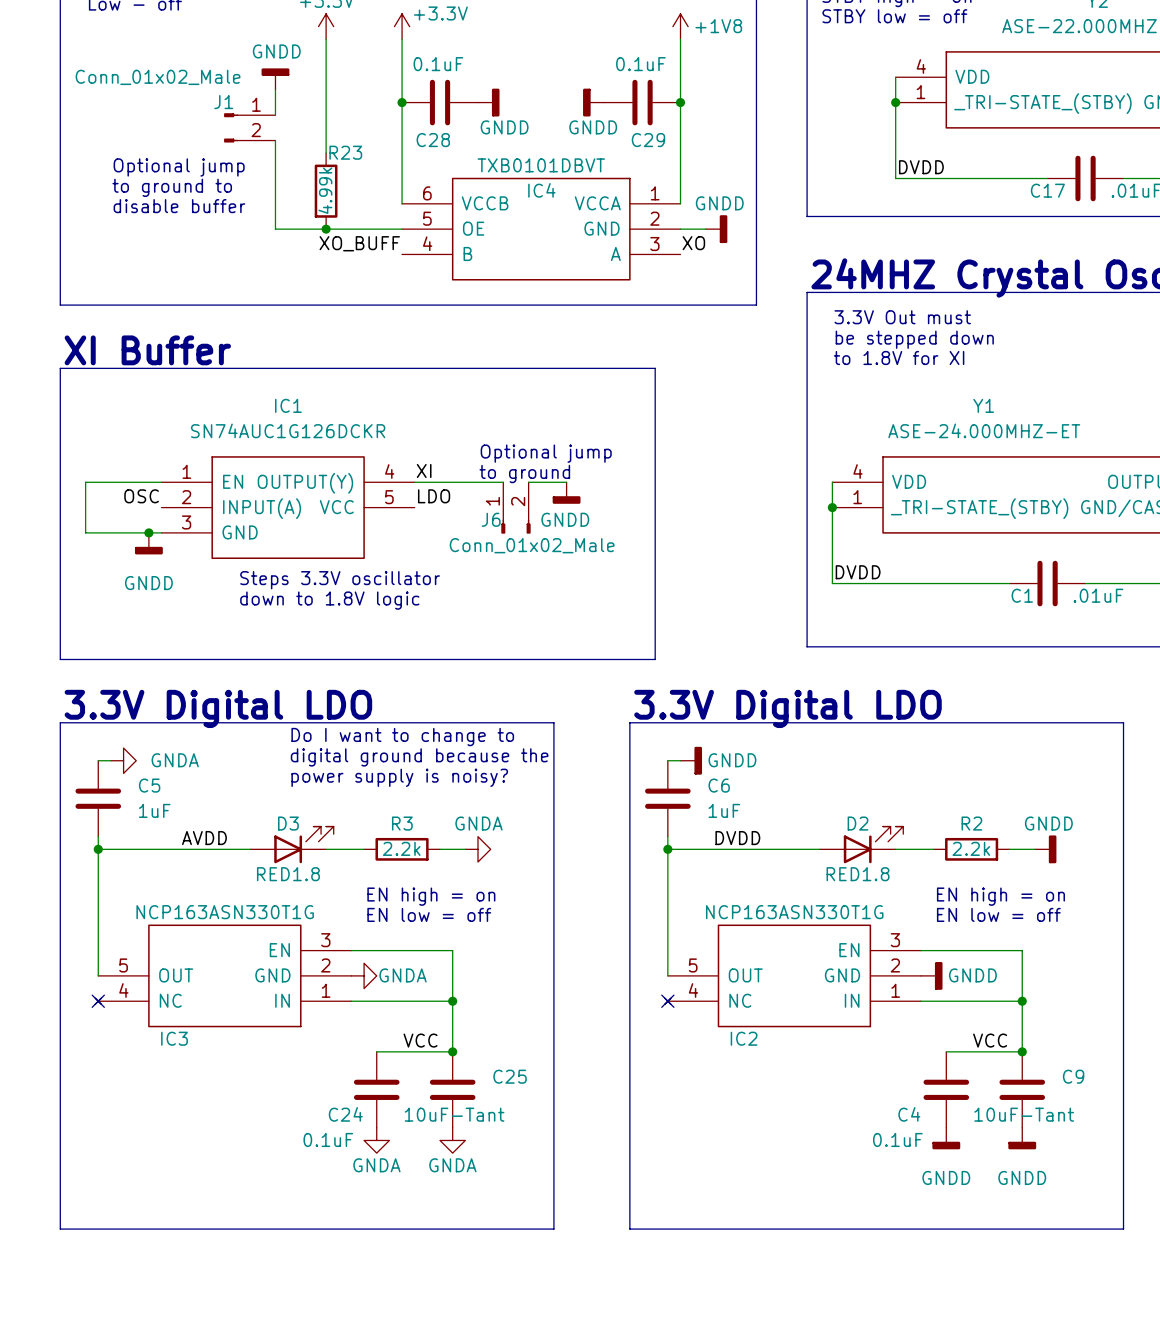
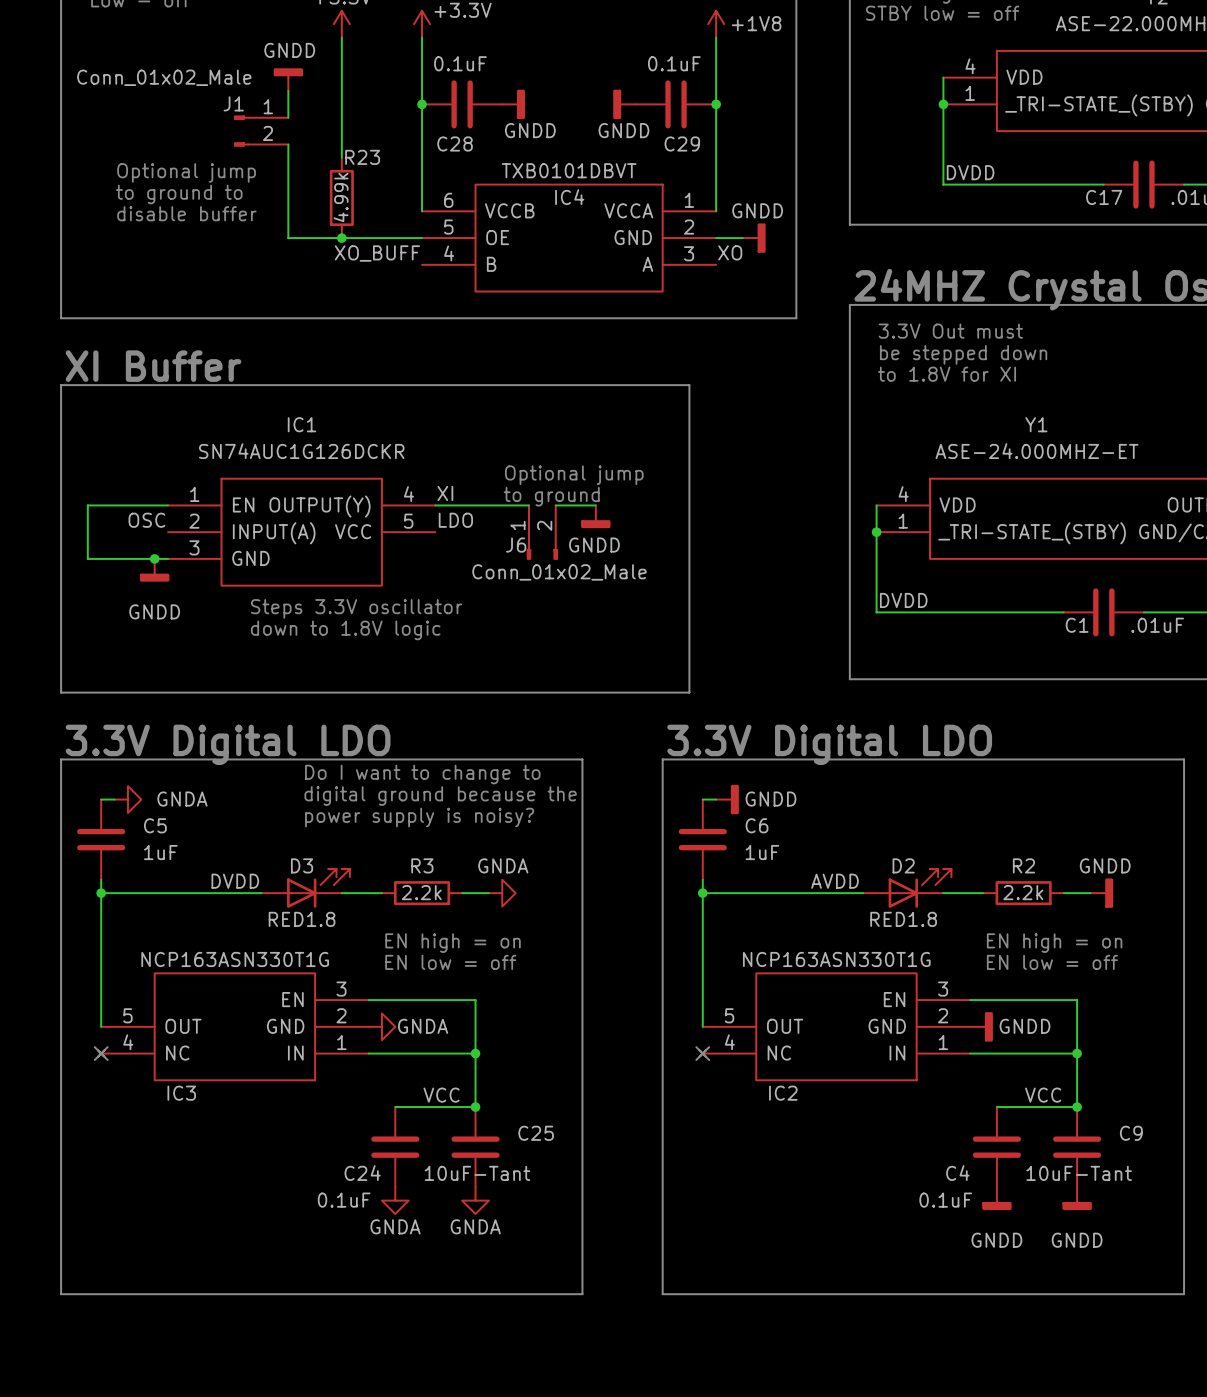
label: AVDD (204, 838) -> DVDD (235, 881)
label: DVDD (737, 838) -> AVDD (834, 881)

